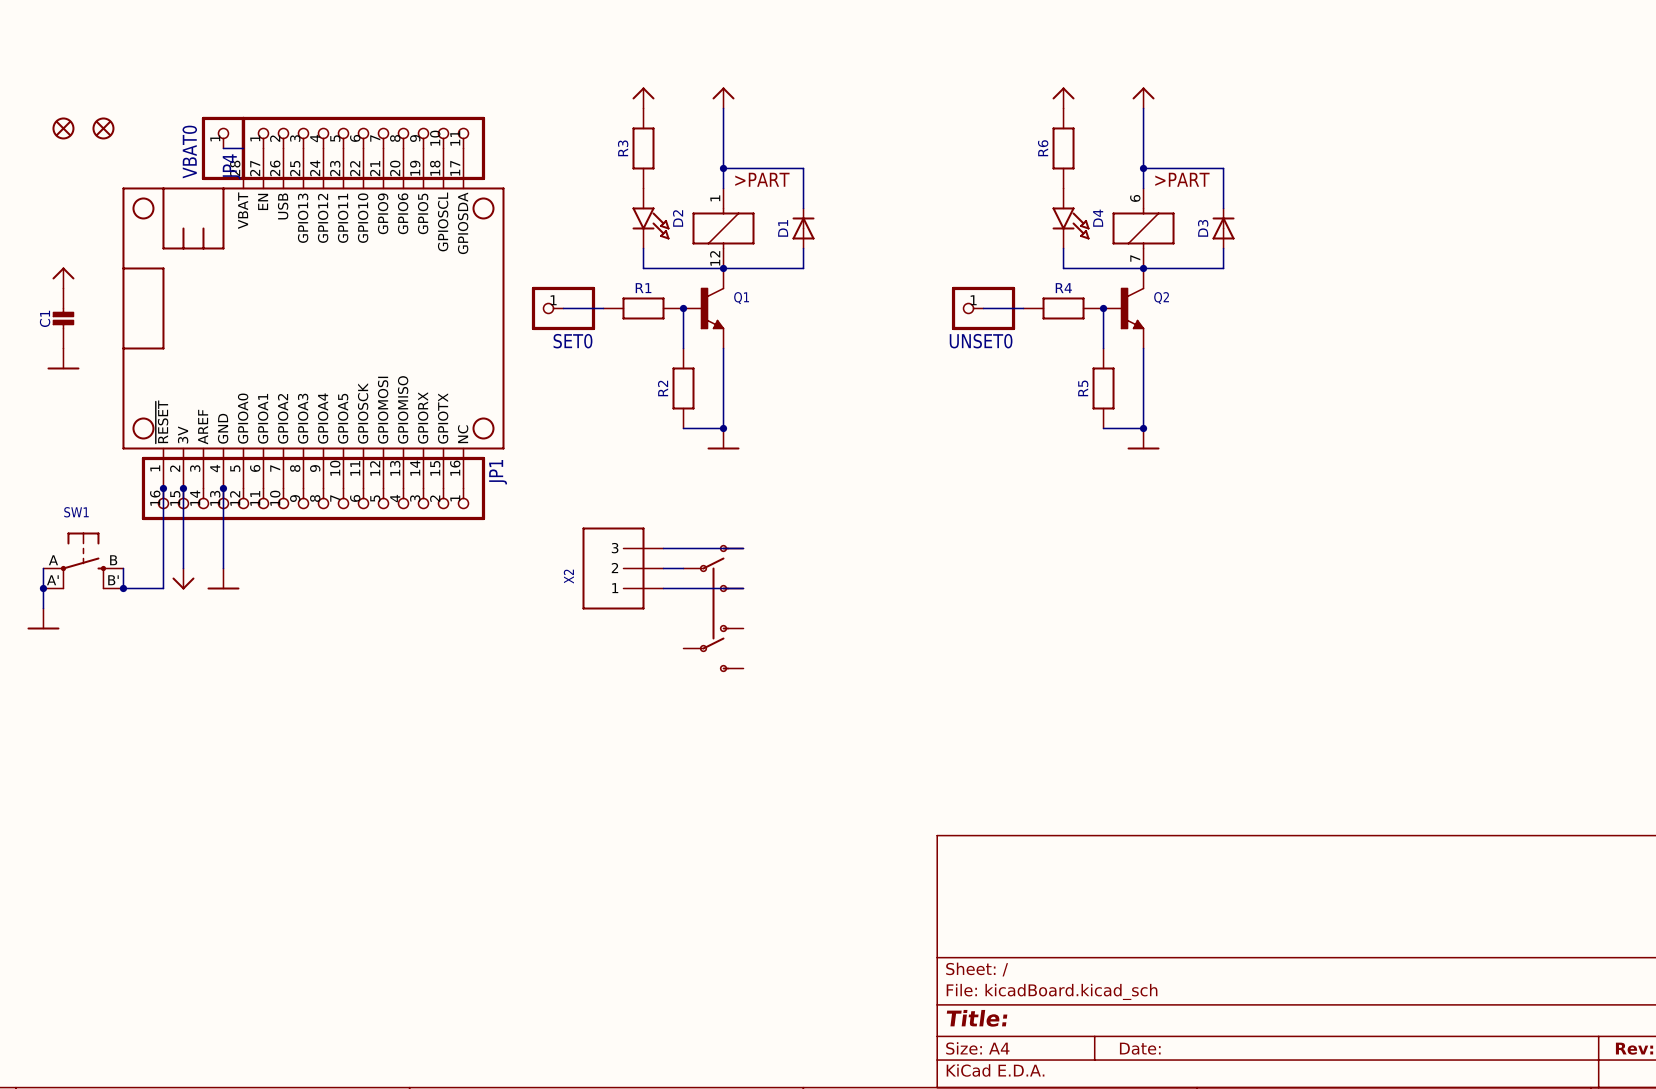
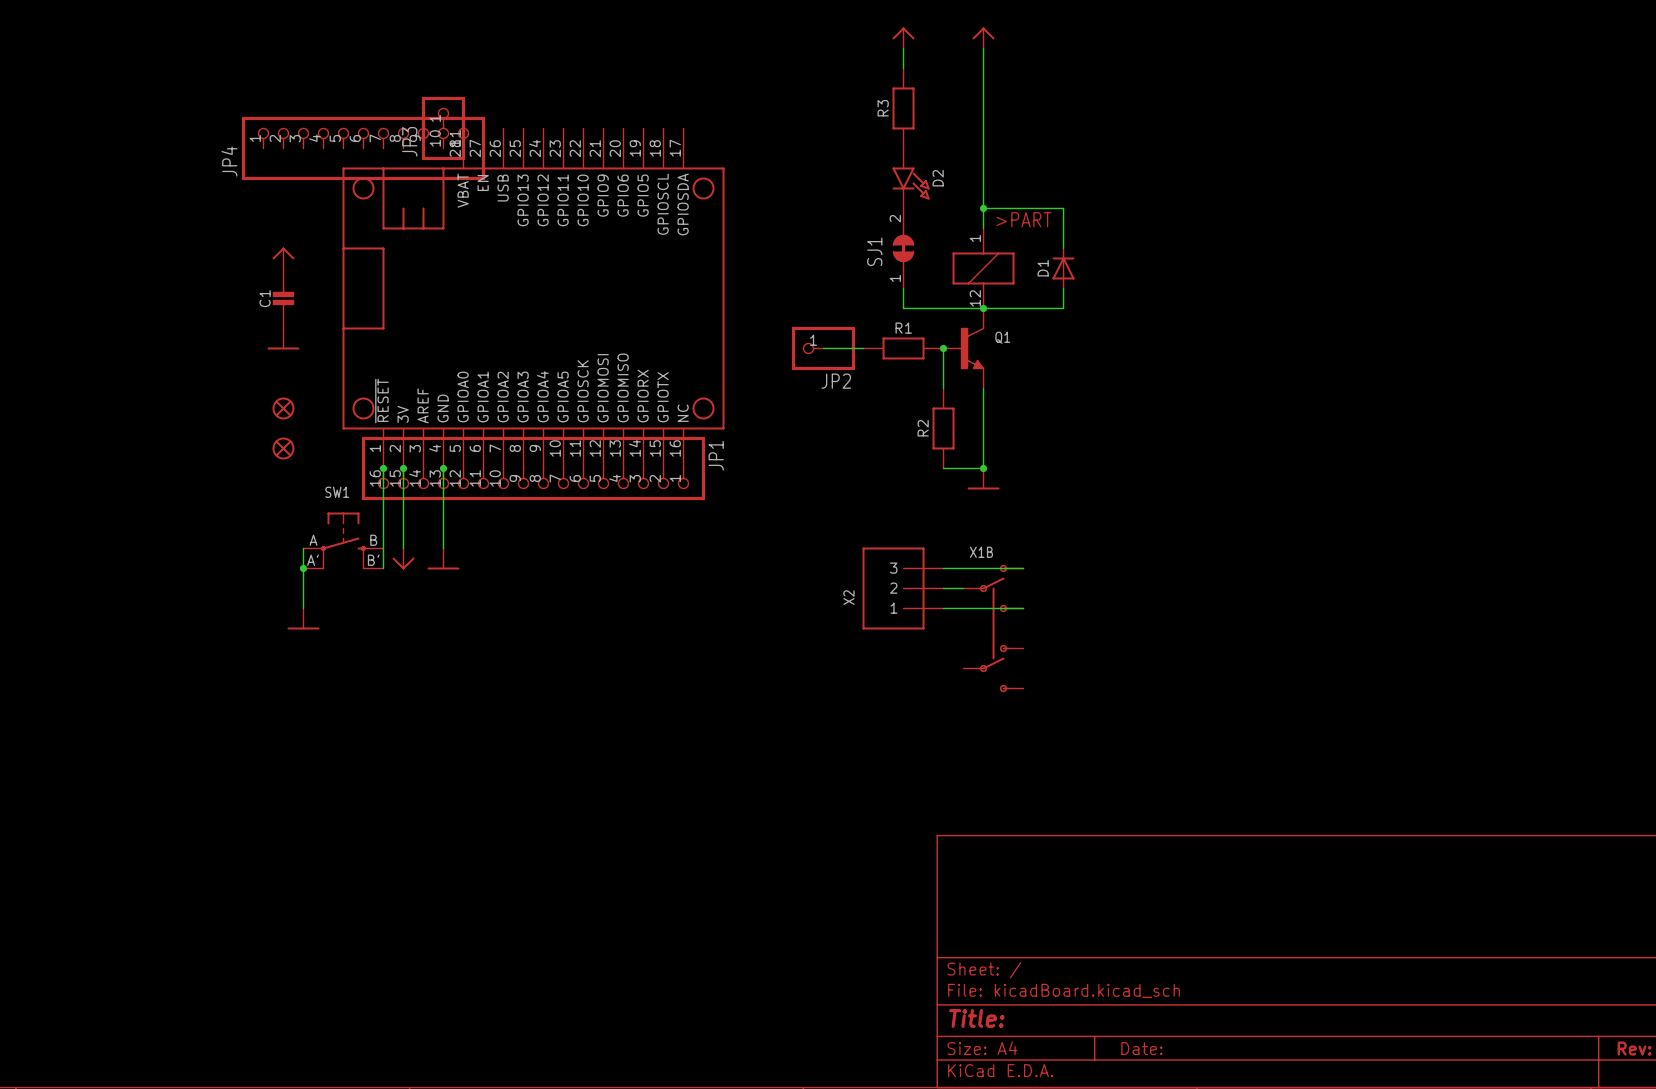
power symbol: none -> (903, 37)
power symbol: none -> (983, 37)
wire: none -> (903, 48) (903, 68)
wire: none -> (983, 48) (983, 228)
power symbol: (643, 97) -> none
power symbol: (723, 97) -> none
power symbol: (1063, 97) -> none
power symbol: (1143, 97) -> none
wire: (723, 108) (723, 188) -> none
wire: (1143, 108) (1143, 188) -> none
part: (63, 128) -> none
part: (103, 128) -> none
JP3: none -> (443, 128)
wire: (223, 148) (243, 148) -> none
VBAT0: (223, 148) -> none
R3 position: (643, 148) -> (903, 108)
R6: (1063, 148) -> none
wire: (723, 168) (803, 168) (803, 208) -> none
junction: (723, 168) -> none
wire: (1143, 168) (1223, 168) (1223, 208) -> none
junction: (1143, 168) -> none
junction: none -> (983, 208)
D2 position: (651, 218) -> (911, 178)
D4: (1071, 218) -> none
part: (723, 228) -> none
D1 position: (803, 228) -> (1063, 268)
part: (1143, 228) -> none
D3: (1223, 228) -> none
wire: (643, 248) (643, 268) (803, 268) (803, 248) -> none
SJ1: none -> (903, 248)
wire: (1063, 248) (1063, 268) (1223, 268) (1223, 248) -> (1063, 248) (1063, 208) (983, 208)
power symbol: none -> (283, 257)
junction: (723, 268) -> none
part: none -> (983, 268)
junction: (1143, 268) -> none
power symbol: (63, 277) -> none
wire: none -> (903, 288) (903, 308) (983, 308)
wire: none -> (1063, 288) (1063, 308) (1023, 308)
part: none -> (533, 298)
wire: (563, 308) (603, 308) -> none
SET0: (563, 308) -> none
R1 position: (643, 308) -> (903, 348)
wire: (683, 308) (683, 348) -> none
junction: (683, 308) -> none
Q1 position: (703, 308) -> (963, 348)
junction: none -> (983, 308)
UNSET0: (983, 308) -> none
R4: (1063, 308) -> none
wire: (1103, 308) (1103, 348) -> (943, 348) (943, 388)
junction: (1103, 308) -> none
Q2: (1123, 308) -> none
C1 position: (63, 318) -> (283, 298)
part: (313, 318) -> none
power symbol: none -> (283, 338)
wire: none -> (823, 348) (863, 348)
JP2: none -> (823, 348)
junction: none -> (943, 348)
wire: (1143, 348) (1143, 428) (1103, 428) -> (983, 388) (983, 468) (943, 468)
power symbol: (63, 358) -> none
R2 position: (683, 388) -> (943, 428)
R5: (1103, 388) -> none
part: none -> (283, 408)
junction: (723, 428) -> none
junction: (1143, 428) -> none
power symbol: (723, 438) -> none
power symbol: (1143, 438) -> none
part: none -> (283, 448)
wire: none -> (383, 468) (383, 568)
junction: none -> (383, 468)
junction: none -> (403, 468)
wire: none -> (443, 468) (443, 548)
junction: none -> (443, 468)
junction: none -> (983, 468)
power symbol: none -> (983, 478)
wire: (163, 488) (163, 588) (123, 588) (123, 568) -> none
junction: (163, 488) -> none
wire: (183, 488) (183, 568) -> none
junction: (183, 488) -> none
wire: (223, 488) (223, 568) -> (403, 468) (403, 548)
junction: (223, 488) -> none
JP1 position: (313, 488) -> (533, 468)
wire: none -> (303, 548) (303, 608)
wire: (663, 548) (743, 548) -> none
power symbol: none -> (403, 559)
power symbol: none -> (443, 559)
SW1 position: (83, 560) -> (343, 540)
wire: (43, 568) (43, 608) -> none
junction: none -> (303, 568)
X2 position: (623, 568) -> (903, 588)
wire: (663, 568) (683, 568) -> none
wire: none -> (943, 568) (1023, 568)
power symbol: (183, 579) -> none
power symbol position: (223, 579) -> (303, 619)
junction: (43, 588) -> none
junction: (123, 588) -> none
wire: (663, 588) (743, 588) -> none
wire: none -> (943, 588) (963, 588)
part: (713, 608) -> none
wire: none -> (943, 608) (1023, 608)
power symbol: (43, 619) -> none
X1B: none -> (993, 628)

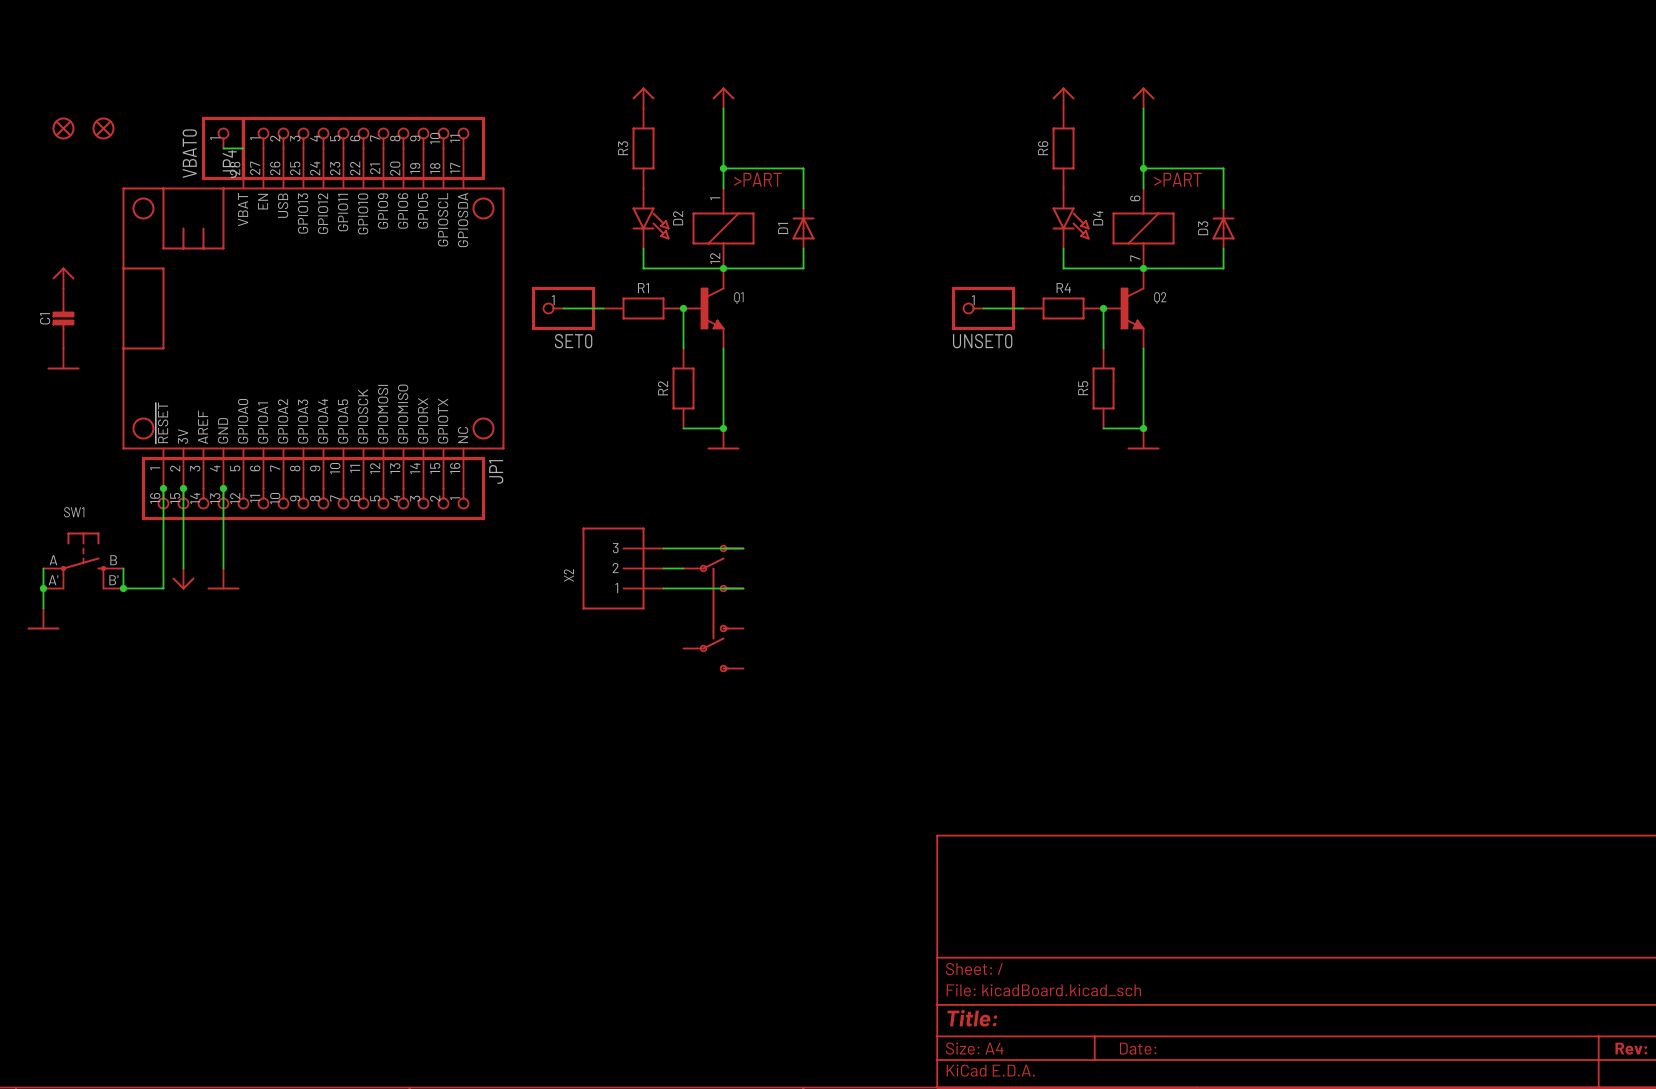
power symbol: (903, 37) -> none
power symbol: (983, 37) -> none
wire: (903, 48) (903, 68) -> none
wire: (983, 48) (983, 228) -> none
power symbol: none -> (643, 97)
power symbol: none -> (723, 97)
power symbol: none -> (1063, 97)
power symbol: none -> (1143, 97)
wire: none -> (723, 108) (723, 188)
R3 position: (903, 108) -> (643, 148)
wire: none -> (1143, 108) (1143, 188)
part: none -> (63, 128)
part: none -> (103, 128)
JP3: (443, 128) -> none
wire: none -> (223, 148) (243, 148)
VBAT0: none -> (223, 148)
R6: none -> (1063, 148)
wire: none -> (723, 168) (803, 168) (803, 208)
junction: none -> (723, 168)
wire: none -> (1143, 168) (1223, 168) (1223, 208)
junction: none -> (1143, 168)
D2 position: (911, 178) -> (651, 218)
wire: (983, 208) (1063, 208) (1063, 248) -> (1223, 248) (1223, 268) (1063, 268) (1063, 248)
junction: (983, 208) -> none
D4: none -> (1071, 218)
part: none -> (723, 228)
part: none -> (1143, 228)
D3: none -> (1223, 228)
wire: none -> (643, 248) (643, 268) (803, 268) (803, 248)
SJ1: (903, 248) -> none
power symbol: (283, 257) -> none
junction: none -> (723, 268)
part: (983, 268) -> none
D1 position: (1063, 268) -> (803, 228)
junction: none -> (1143, 268)
power symbol: none -> (63, 277)
wire: (903, 288) (903, 308) (983, 308) -> none
wire: (1063, 288) (1063, 308) (1023, 308) -> none
C1 position: (283, 298) -> (63, 318)
part: (533, 298) -> none
wire: none -> (563, 308) (603, 308)
SET0: none -> (563, 308)
wire: none -> (683, 308) (683, 348)
junction: none -> (683, 308)
junction: (983, 308) -> none
UNSET0: none -> (983, 308)
R4: none -> (1063, 308)
junction: none -> (1103, 308)
Q2: none -> (1123, 308)
part: none -> (313, 318)
power symbol: (283, 338) -> none
wire: (823, 348) (863, 348) -> none
JP2: (823, 348) -> none
R1 position: (903, 348) -> (643, 308)
wire: (943, 348) (943, 388) -> (1103, 308) (1103, 348)
junction: (943, 348) -> none
Q1 position: (963, 348) -> (703, 308)
power symbol: none -> (63, 358)
wire: (983, 388) (983, 468) (943, 468) -> (1143, 348) (1143, 428) (1103, 428)
R5: none -> (1103, 388)
part: (283, 408) -> none
junction: none -> (723, 428)
R2 position: (943, 428) -> (683, 388)
junction: none -> (1143, 428)
power symbol: none -> (723, 438)
power symbol: none -> (1143, 438)
part: (283, 448) -> none
wire: (383, 468) (383, 568) -> none
junction: (383, 468) -> none
wire: (403, 468) (403, 548) -> (223, 488) (223, 568)
junction: (403, 468) -> none
wire: (443, 468) (443, 548) -> none
junction: (443, 468) -> none
JP1 position: (533, 468) -> (313, 488)
junction: (983, 468) -> none
power symbol: (983, 478) -> none
wire: none -> (163, 488) (163, 588) (123, 588) (123, 568)
junction: none -> (163, 488)
wire: none -> (183, 488) (183, 568)
junction: none -> (183, 488)
junction: none -> (223, 488)
SW1 position: (343, 540) -> (83, 560)
wire: (303, 548) (303, 608) -> none
wire: none -> (663, 548) (743, 548)
power symbol: (403, 559) -> none
power symbol: (443, 559) -> none
wire: none -> (43, 568) (43, 608)
junction: (303, 568) -> none
wire: none -> (663, 568) (683, 568)
wire: (943, 568) (1023, 568) -> none
power symbol: none -> (183, 579)
junction: none -> (43, 588)
junction: none -> (123, 588)
wire: none -> (663, 588) (743, 588)
X2 position: (903, 588) -> (623, 568)
wire: (943, 588) (963, 588) -> none
part: none -> (713, 608)
wire: (943, 608) (1023, 608) -> none
power symbol: none -> (43, 619)
power symbol position: (303, 619) -> (223, 579)
X1B: (993, 628) -> none

